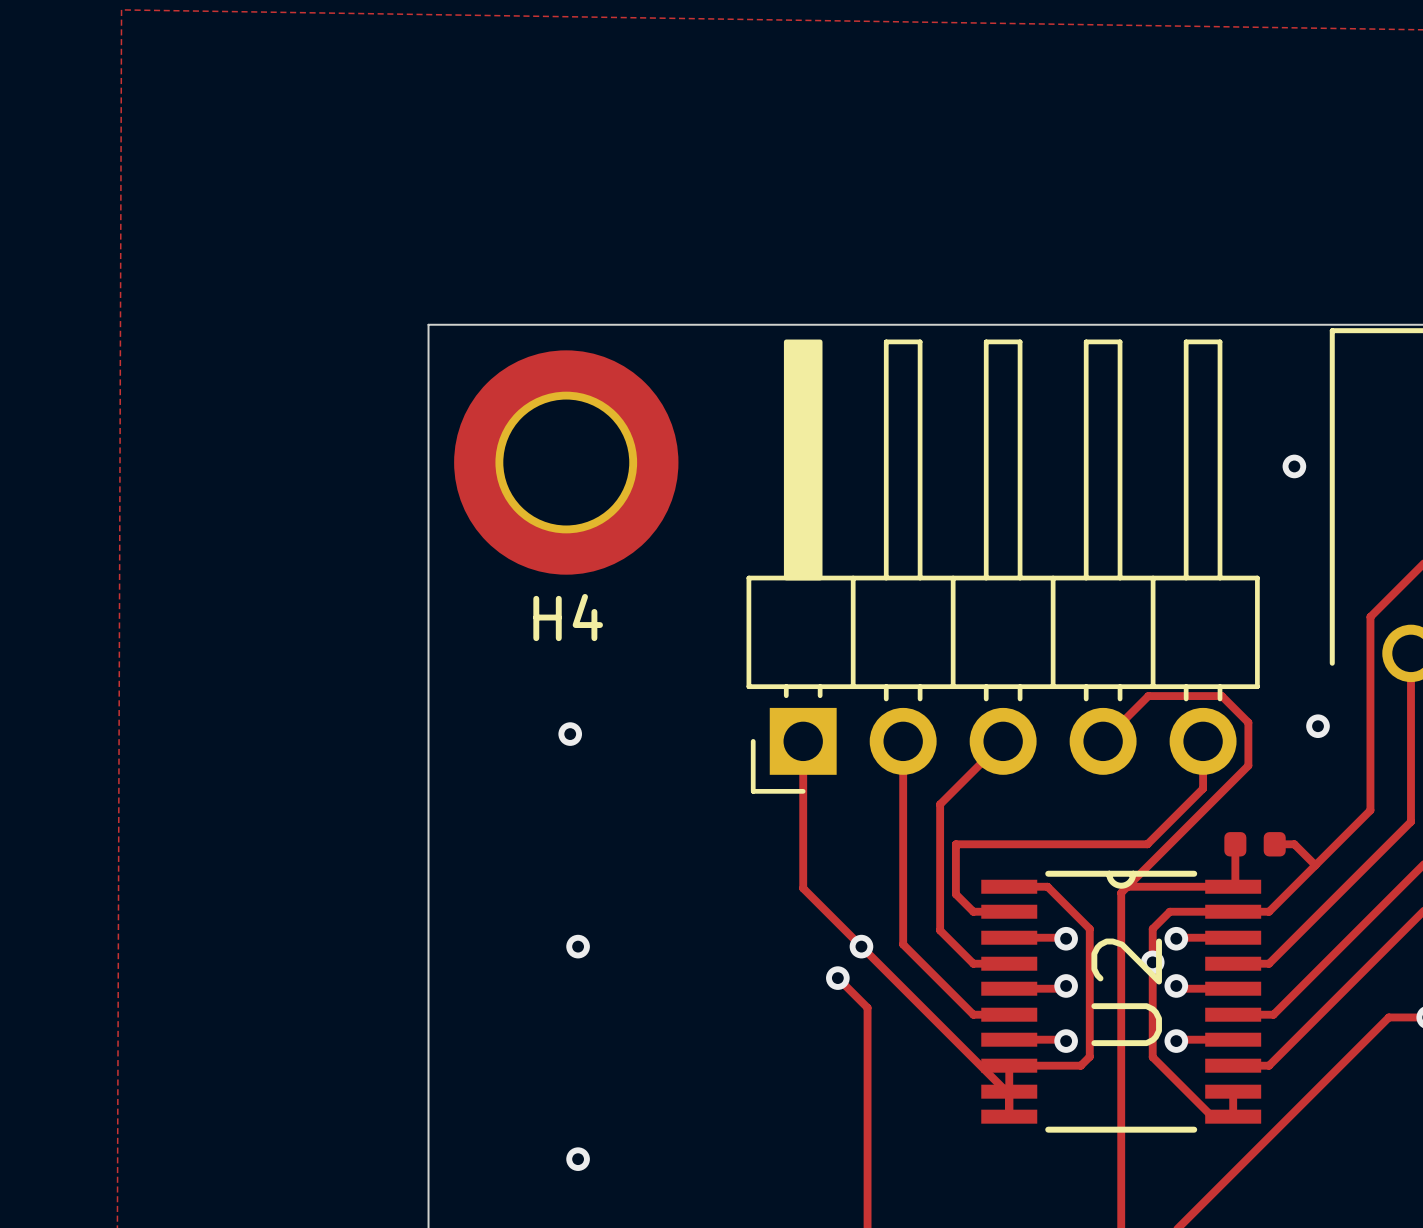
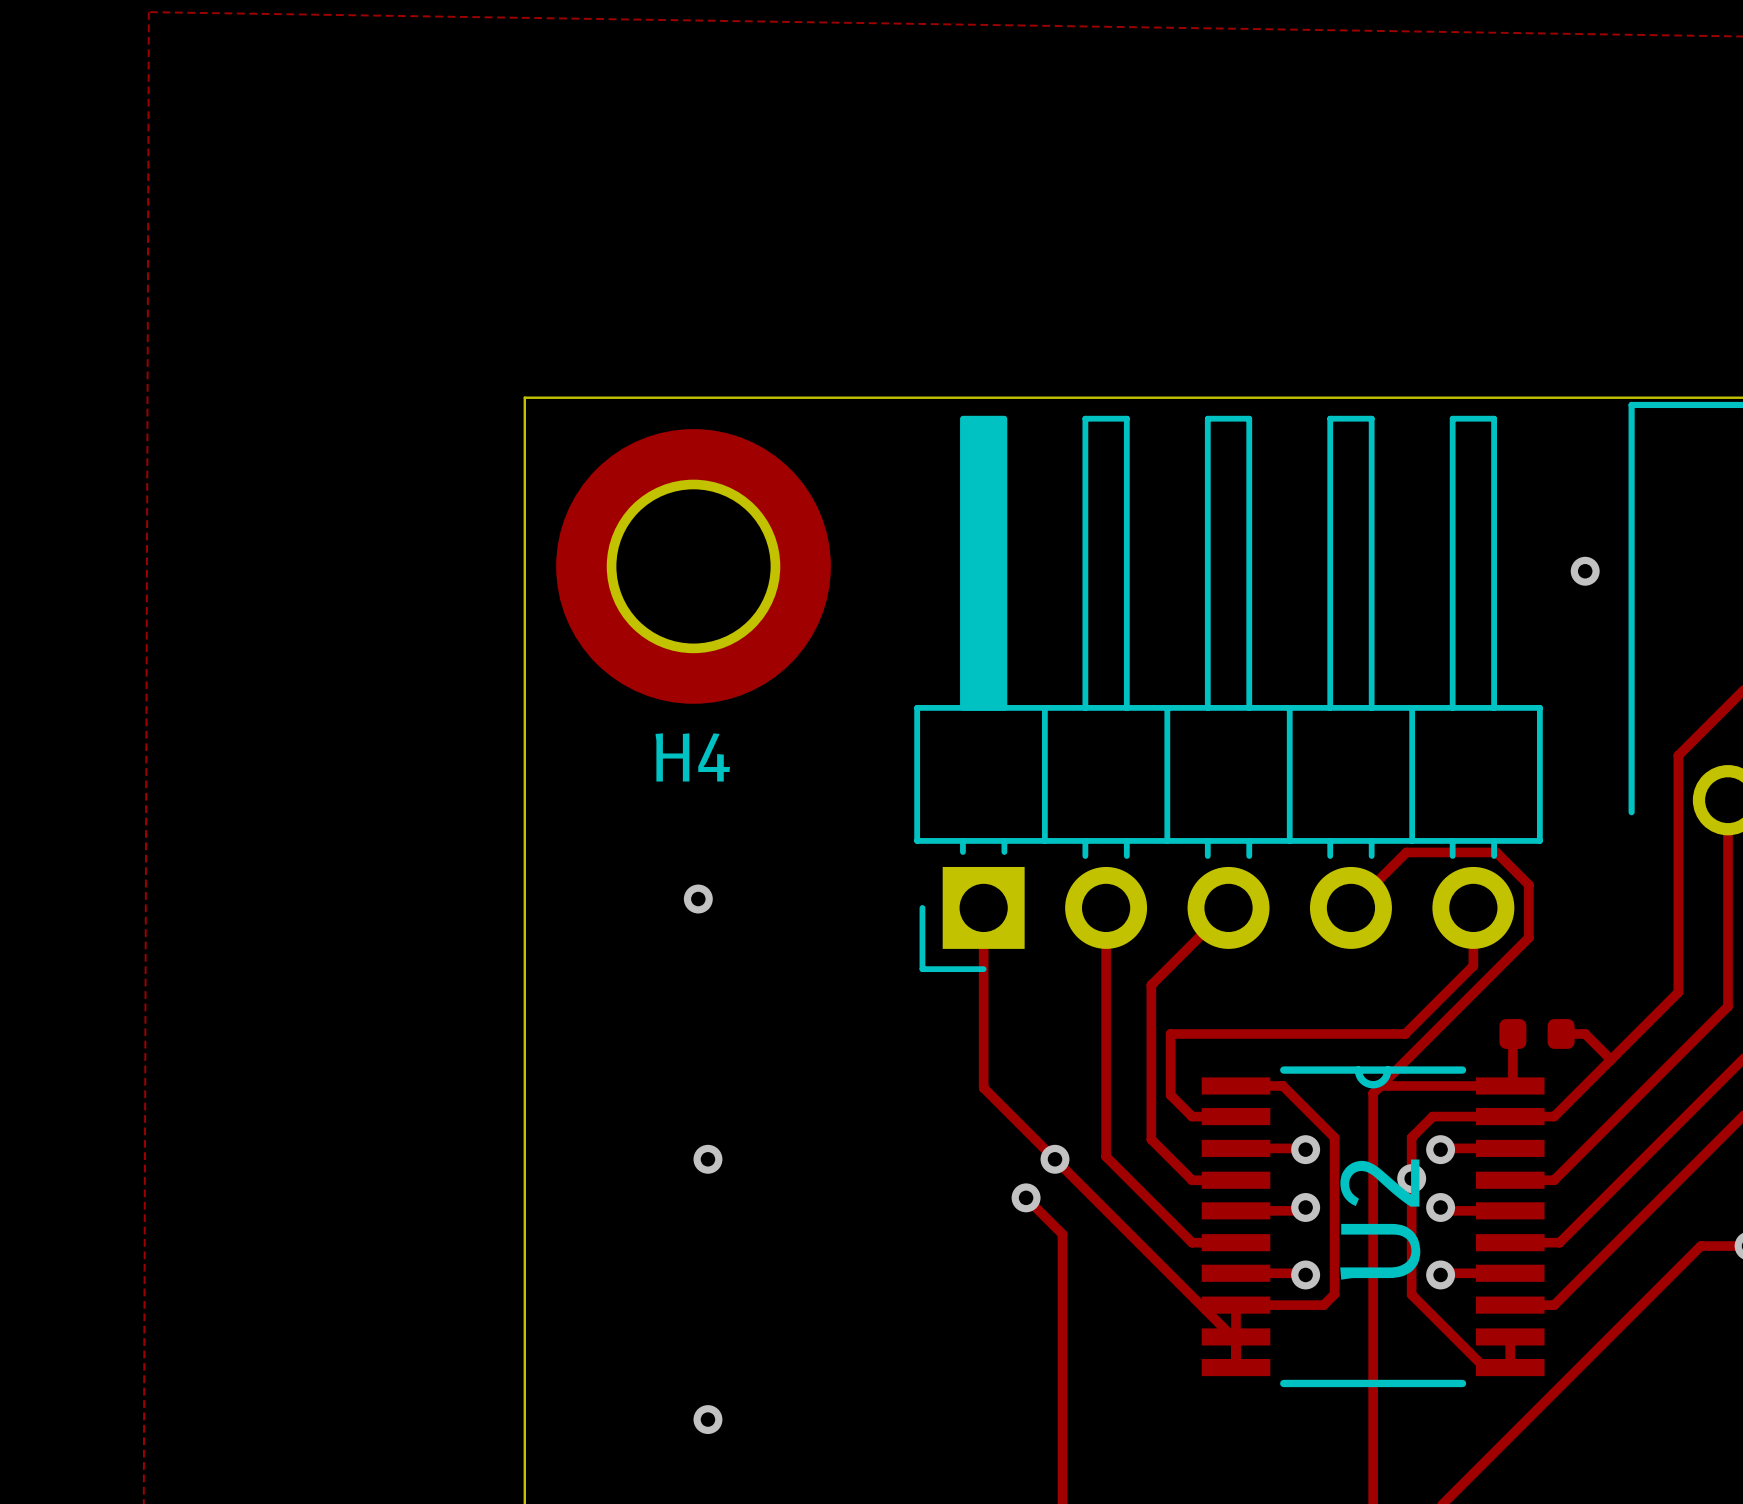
via: (1318, 726) -> none

